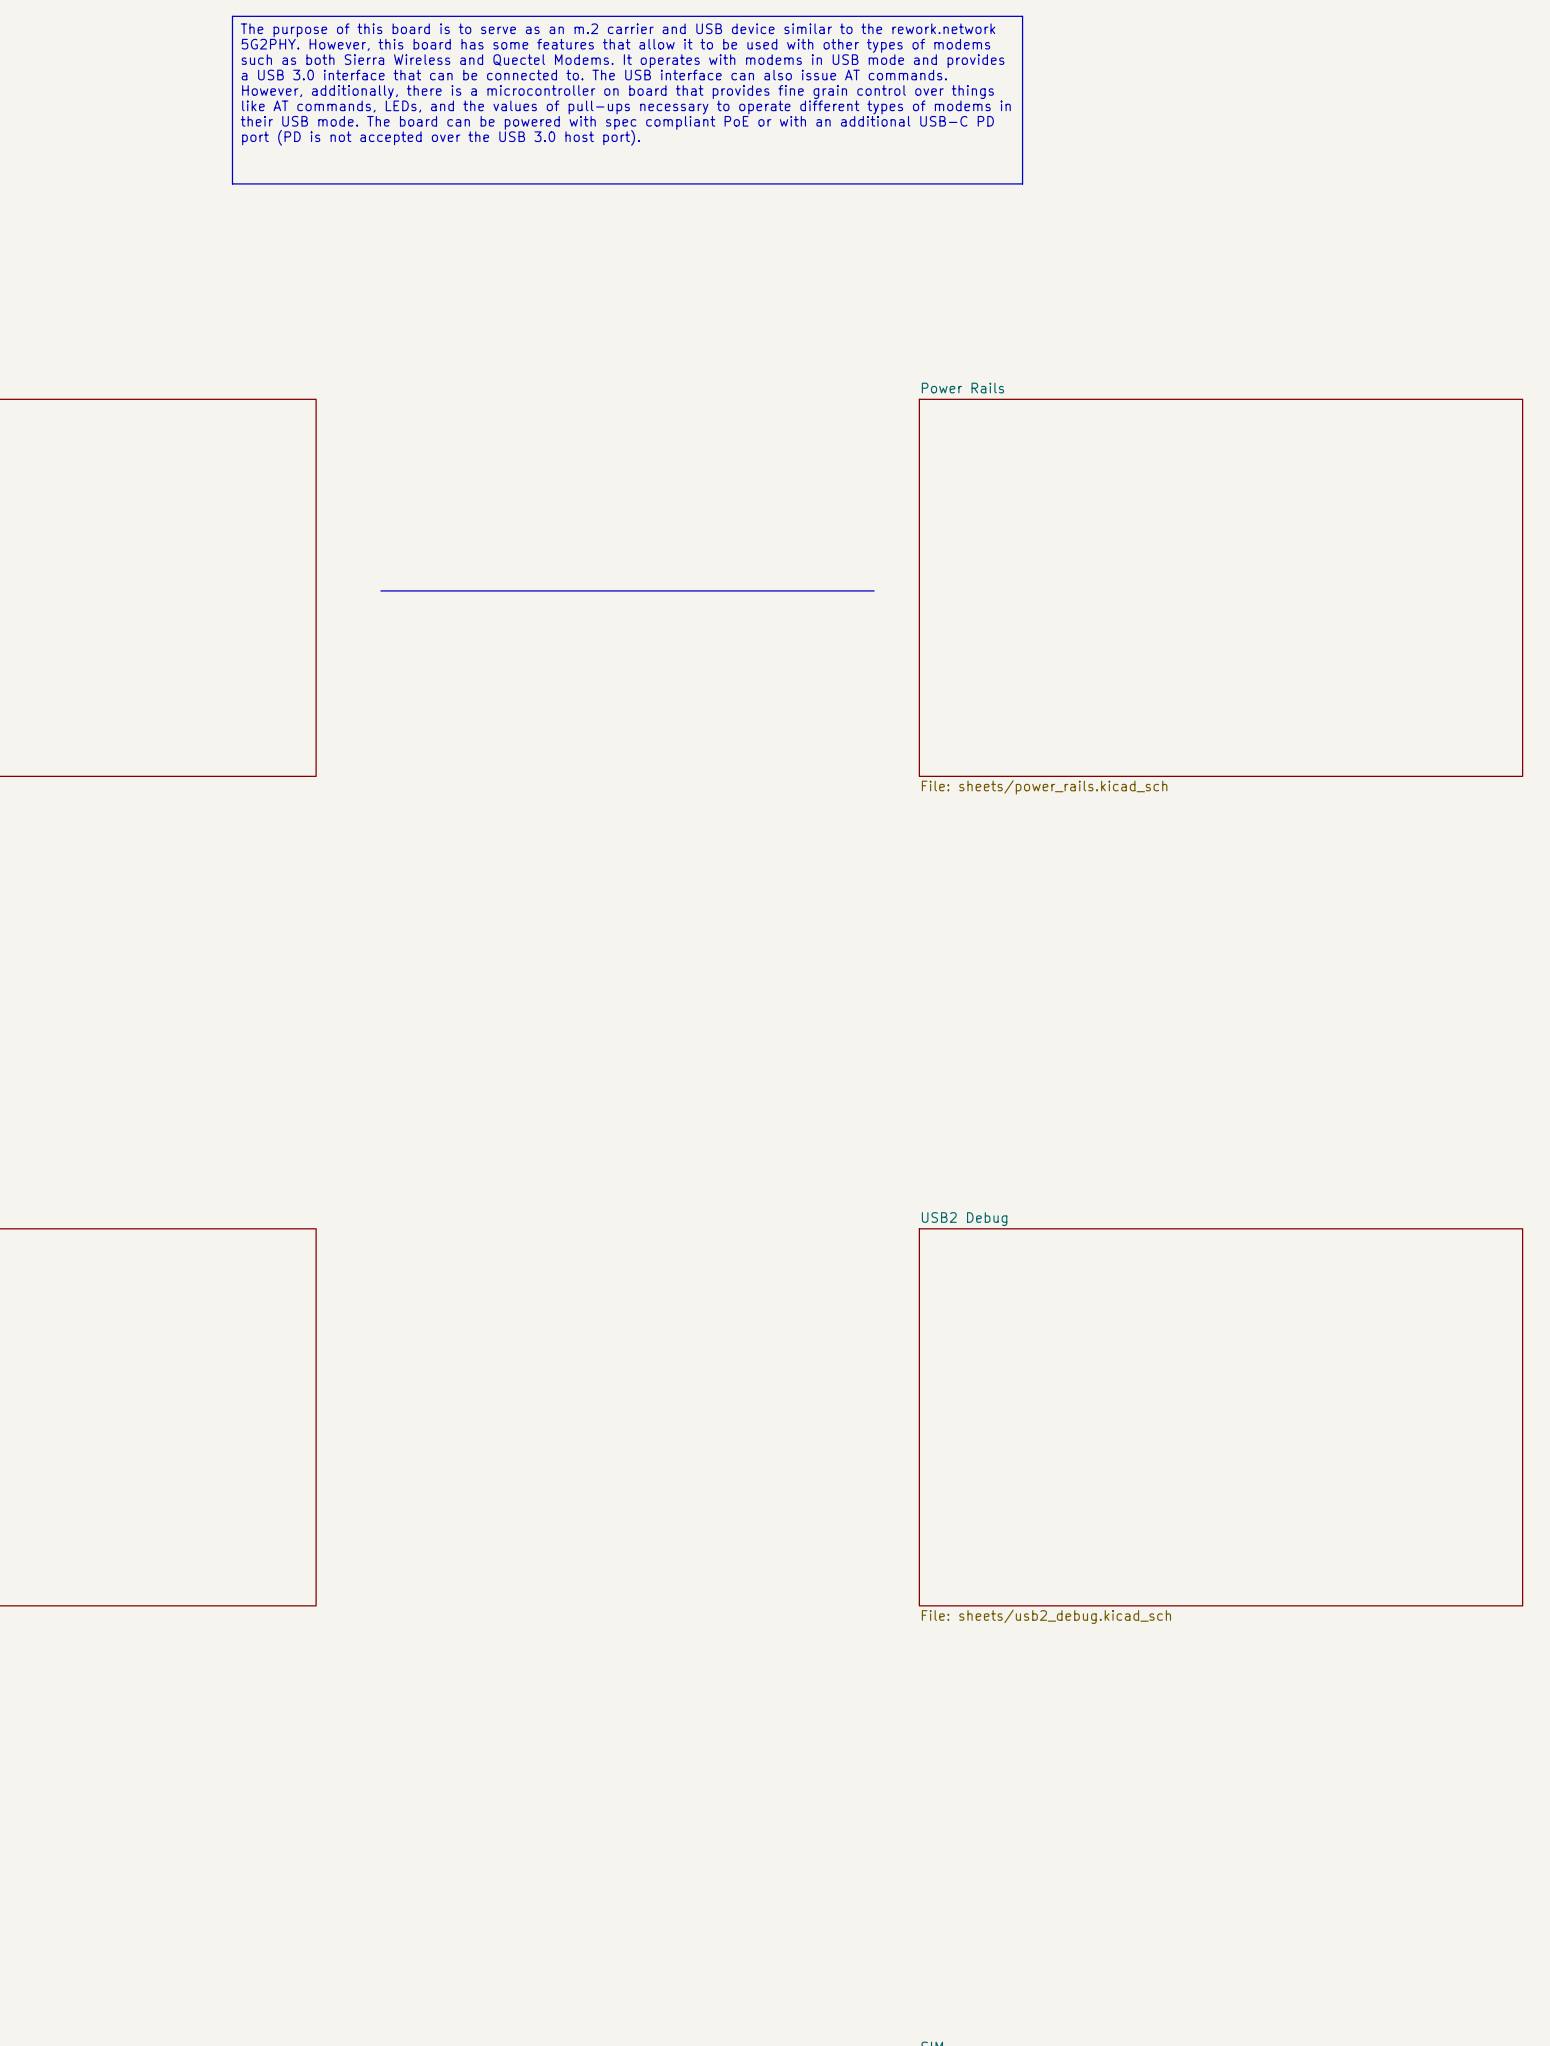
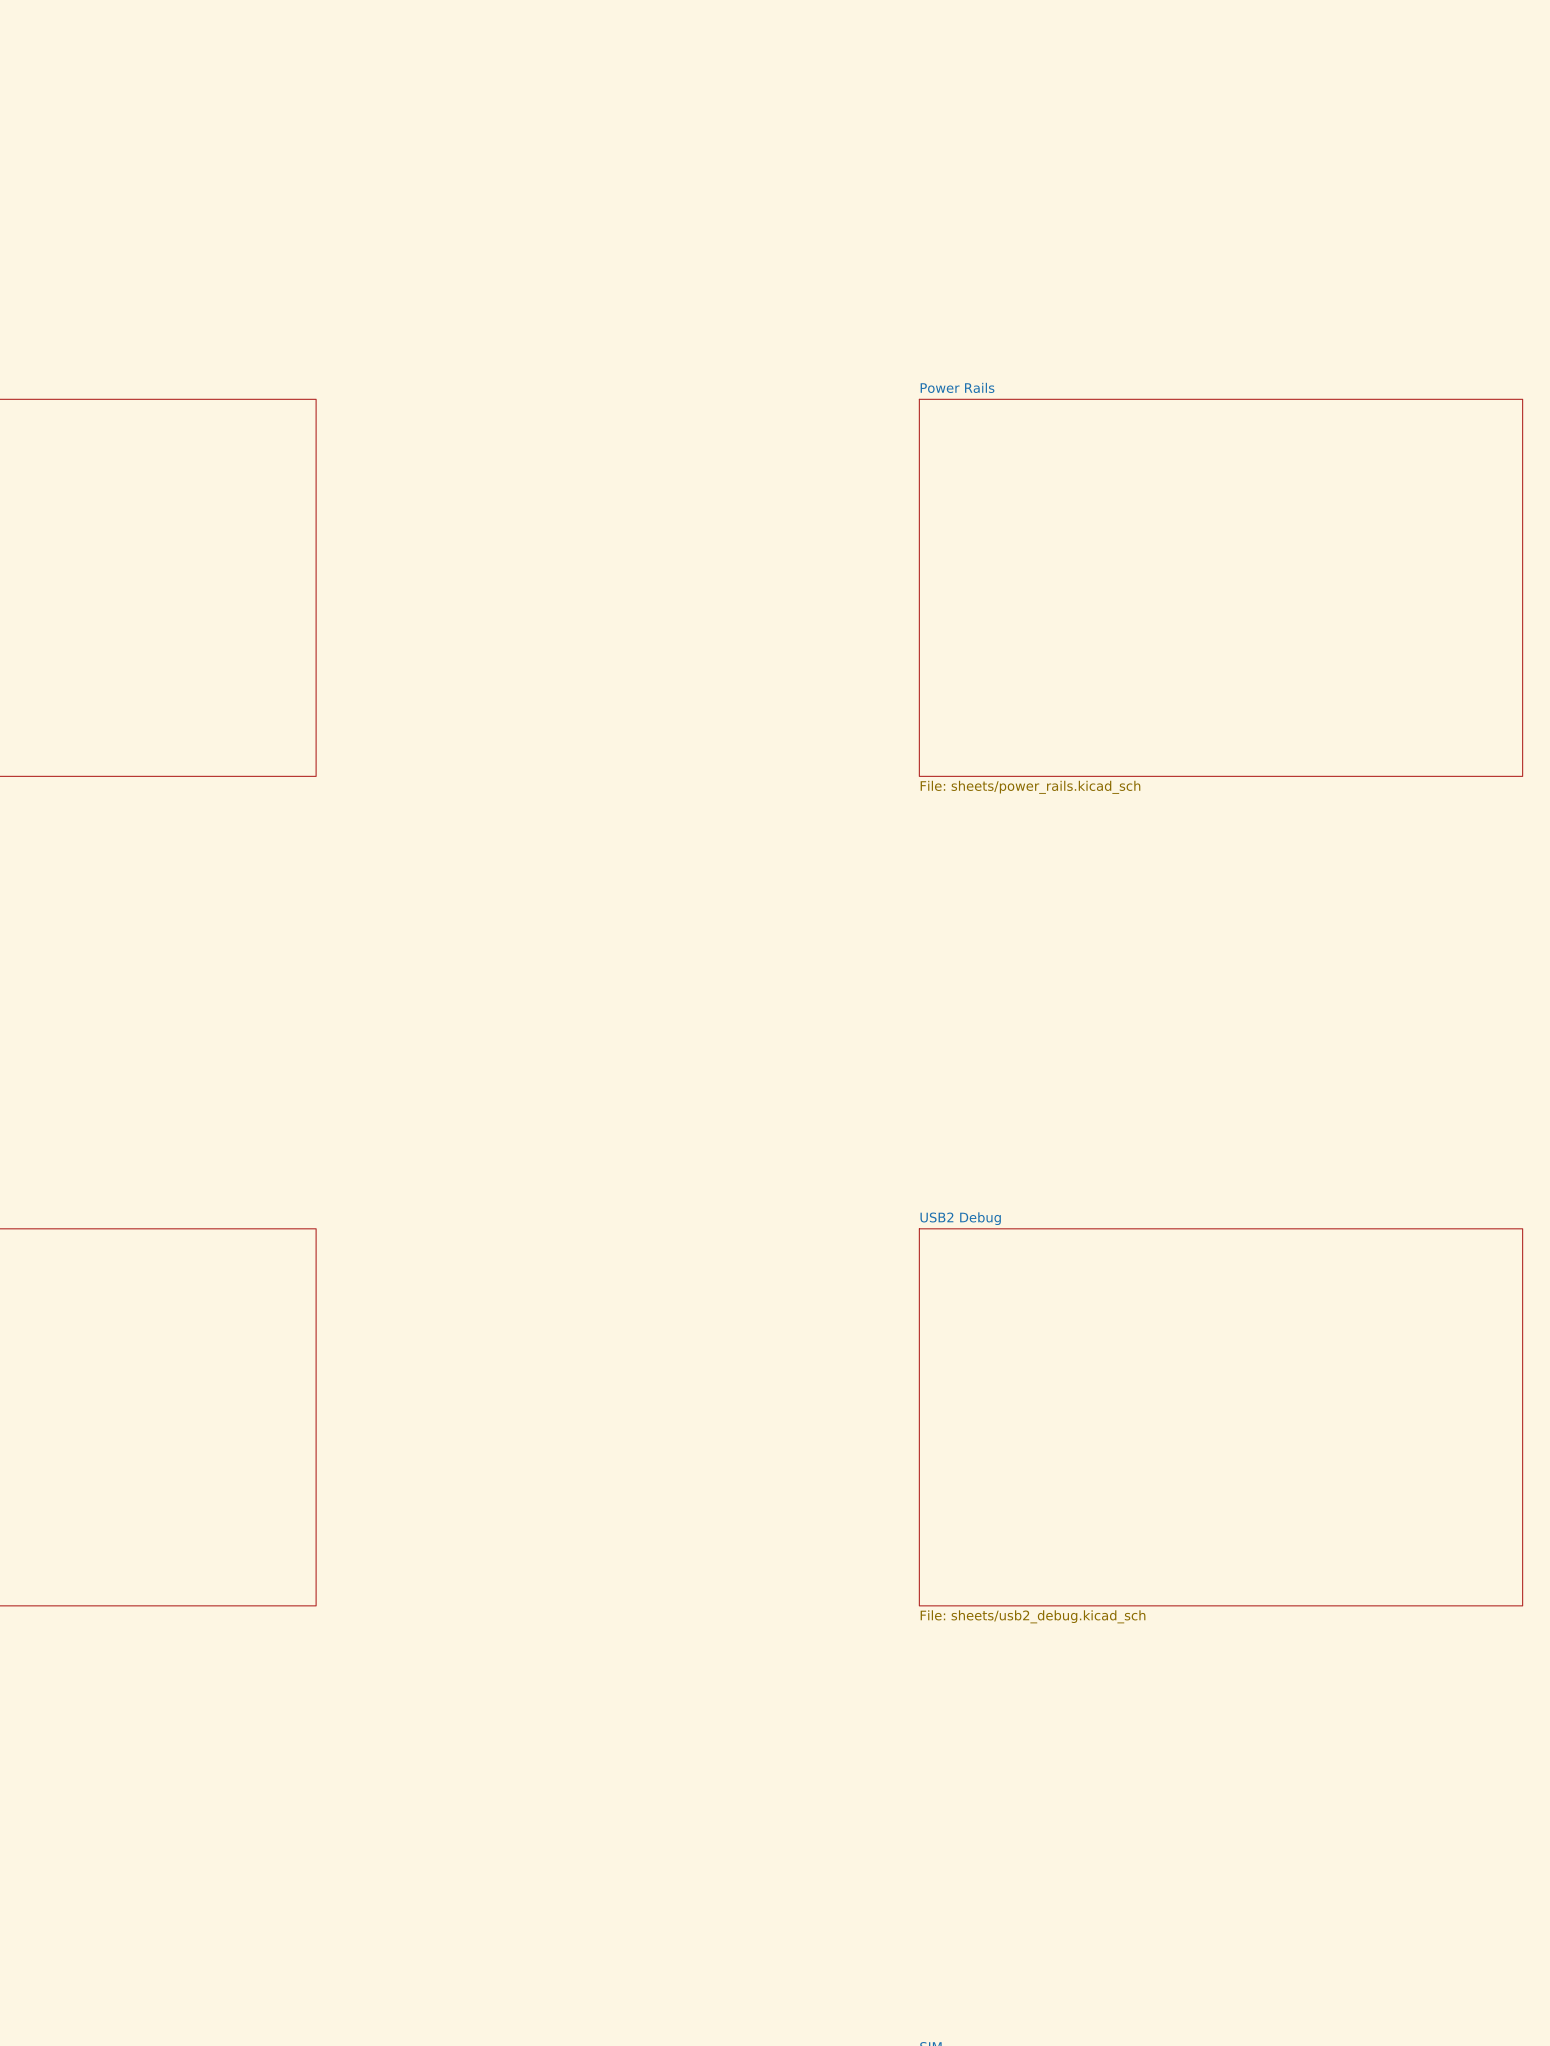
line: (232, 16) (1022, 16) (1022, 183) (232, 183) (232, 16) -> none
text: The purpose of this board is to serve as an m.2 carrier and USB device similar to the rework.network (618, 30) -> none
text: 5G2PHY. However, this board has some features that allow it to be used with other types of modems (615, 45) -> none
text: such as both Sierra Wireless and Quectel Modems. It operates with modems in USB mode and provides (623, 61) -> none
text: a USB 3.0 interface that can be connected to. The USB interface can also issue AT commands. (594, 75) -> none
text: However, additionally, there is a microcontroller on board that provides fine grain control over things (618, 92) -> none
text: like AT commands, LEDs, and the values of pull-ups necessary to operate different types of modems in (626, 107) -> none
text: their USB mode. The board can be powered with spec compliant PoE or with an additional USB-C PD (617, 122) -> none
text: port (PD is not accepted over the USB 3.0 host port). (441, 137) -> none
line: (380, 590) (874, 590) -> none

